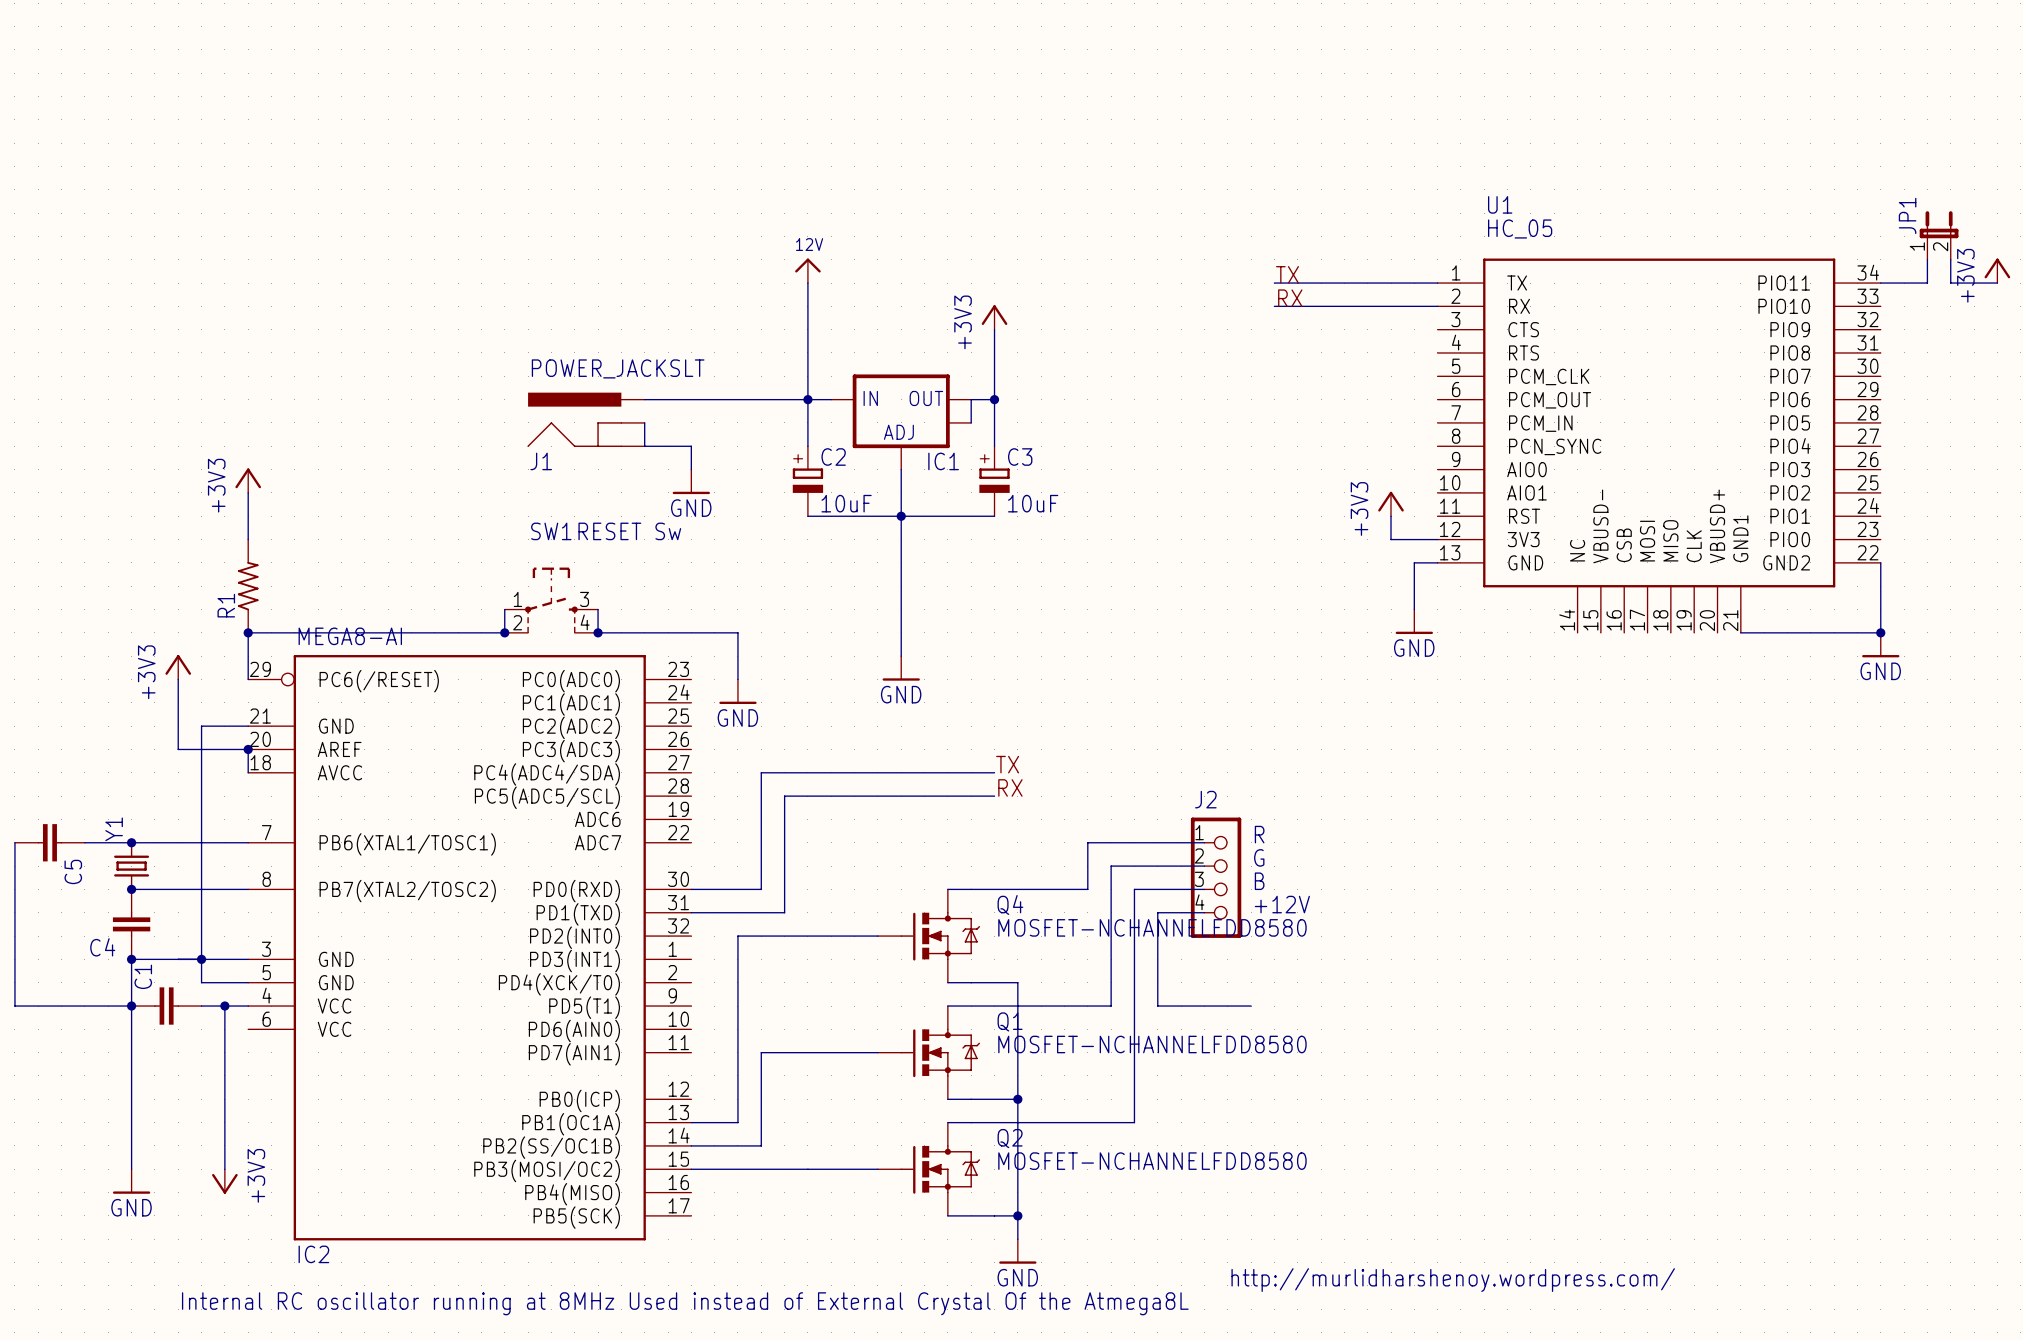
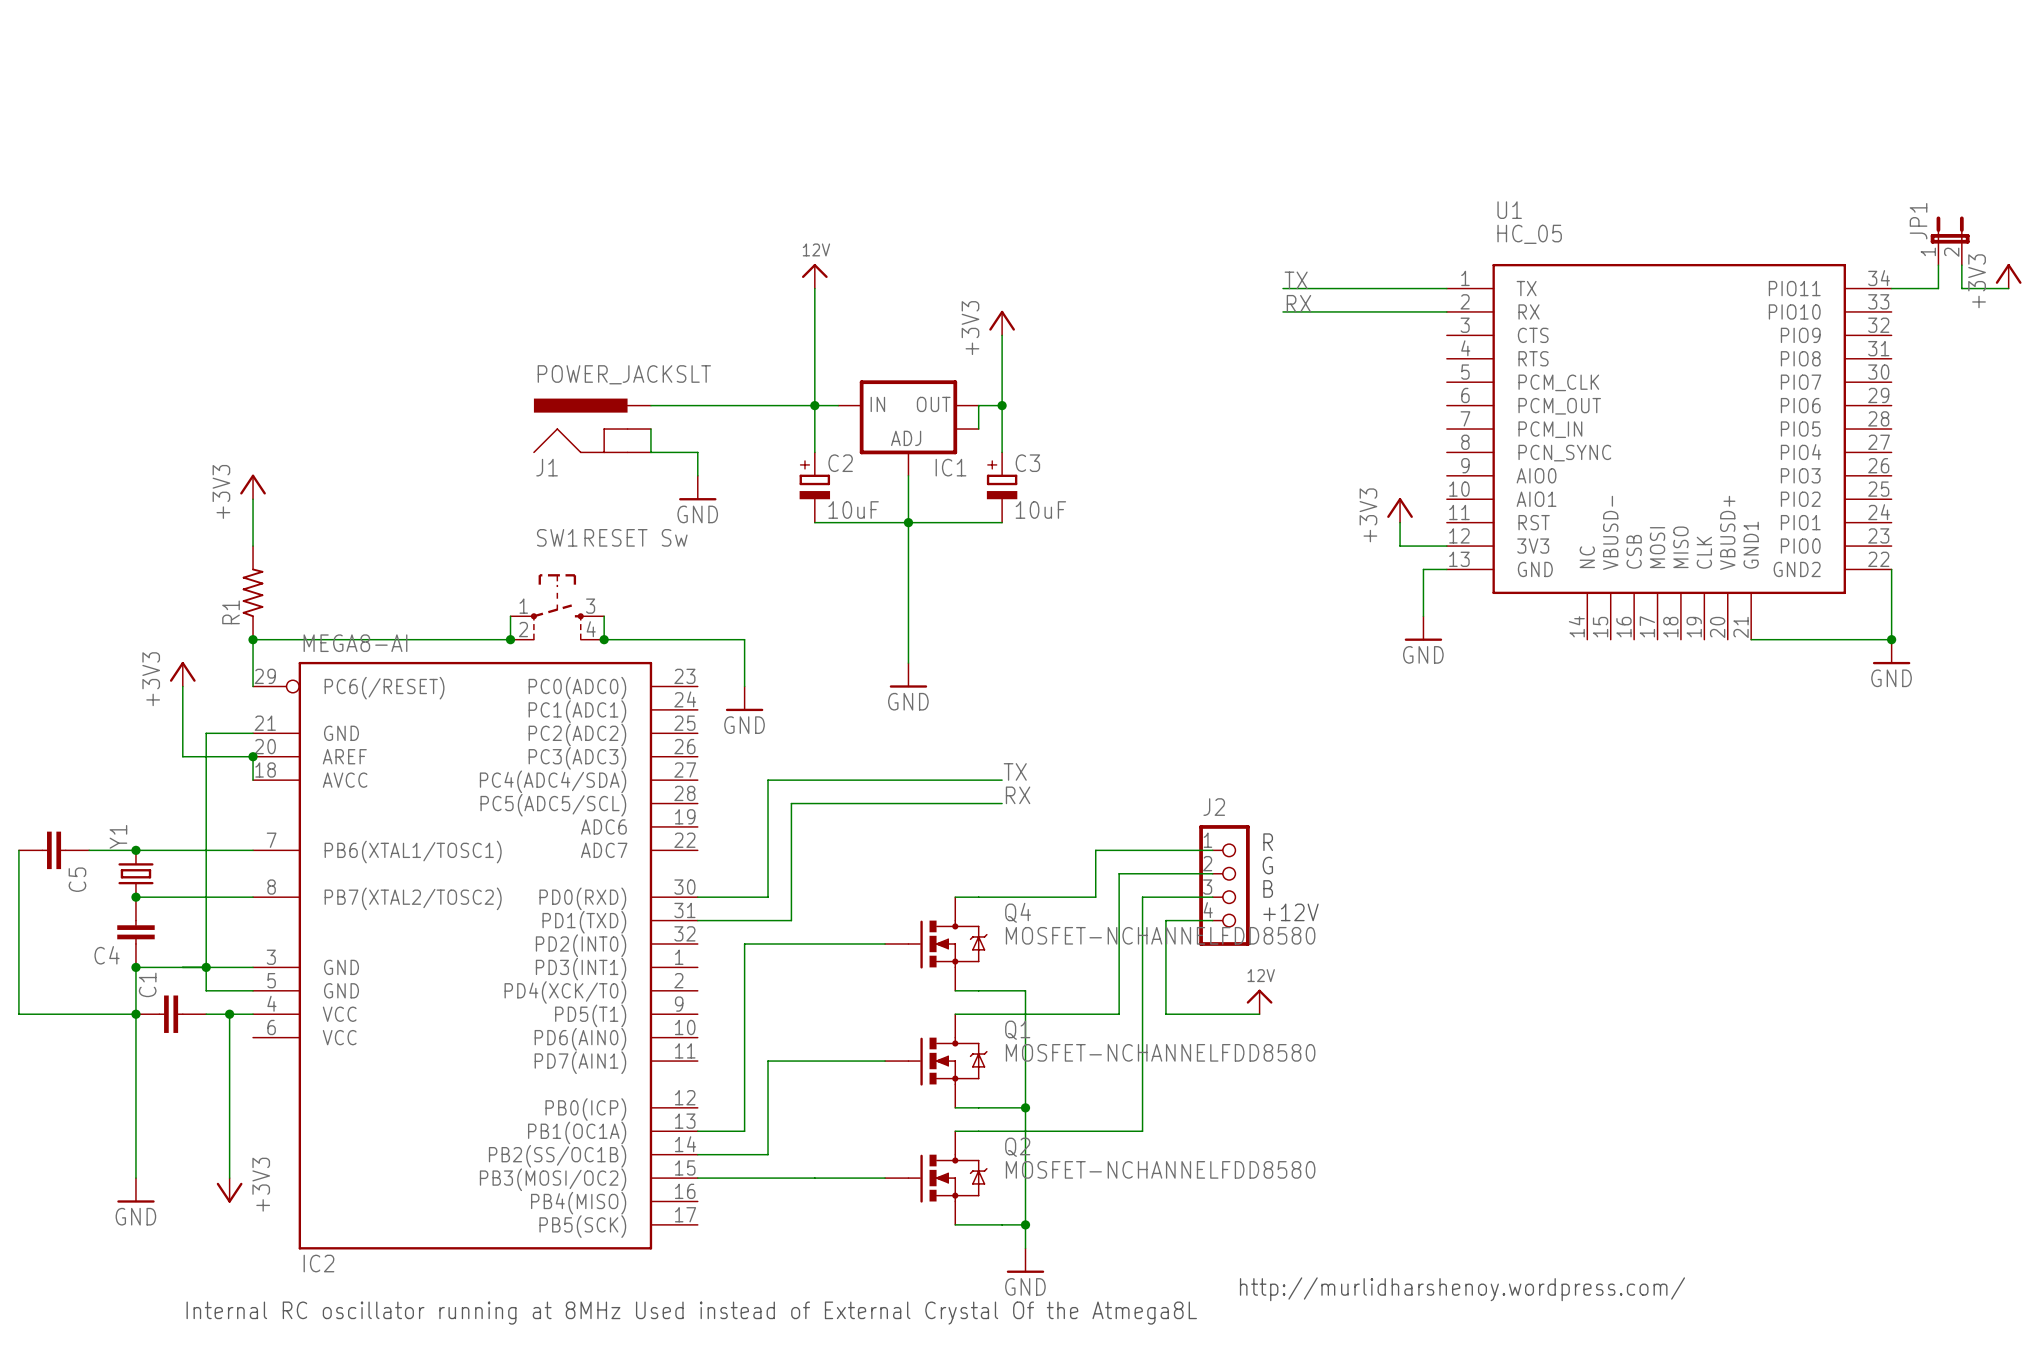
power symbol: none -> 12V (1259, 1001)

